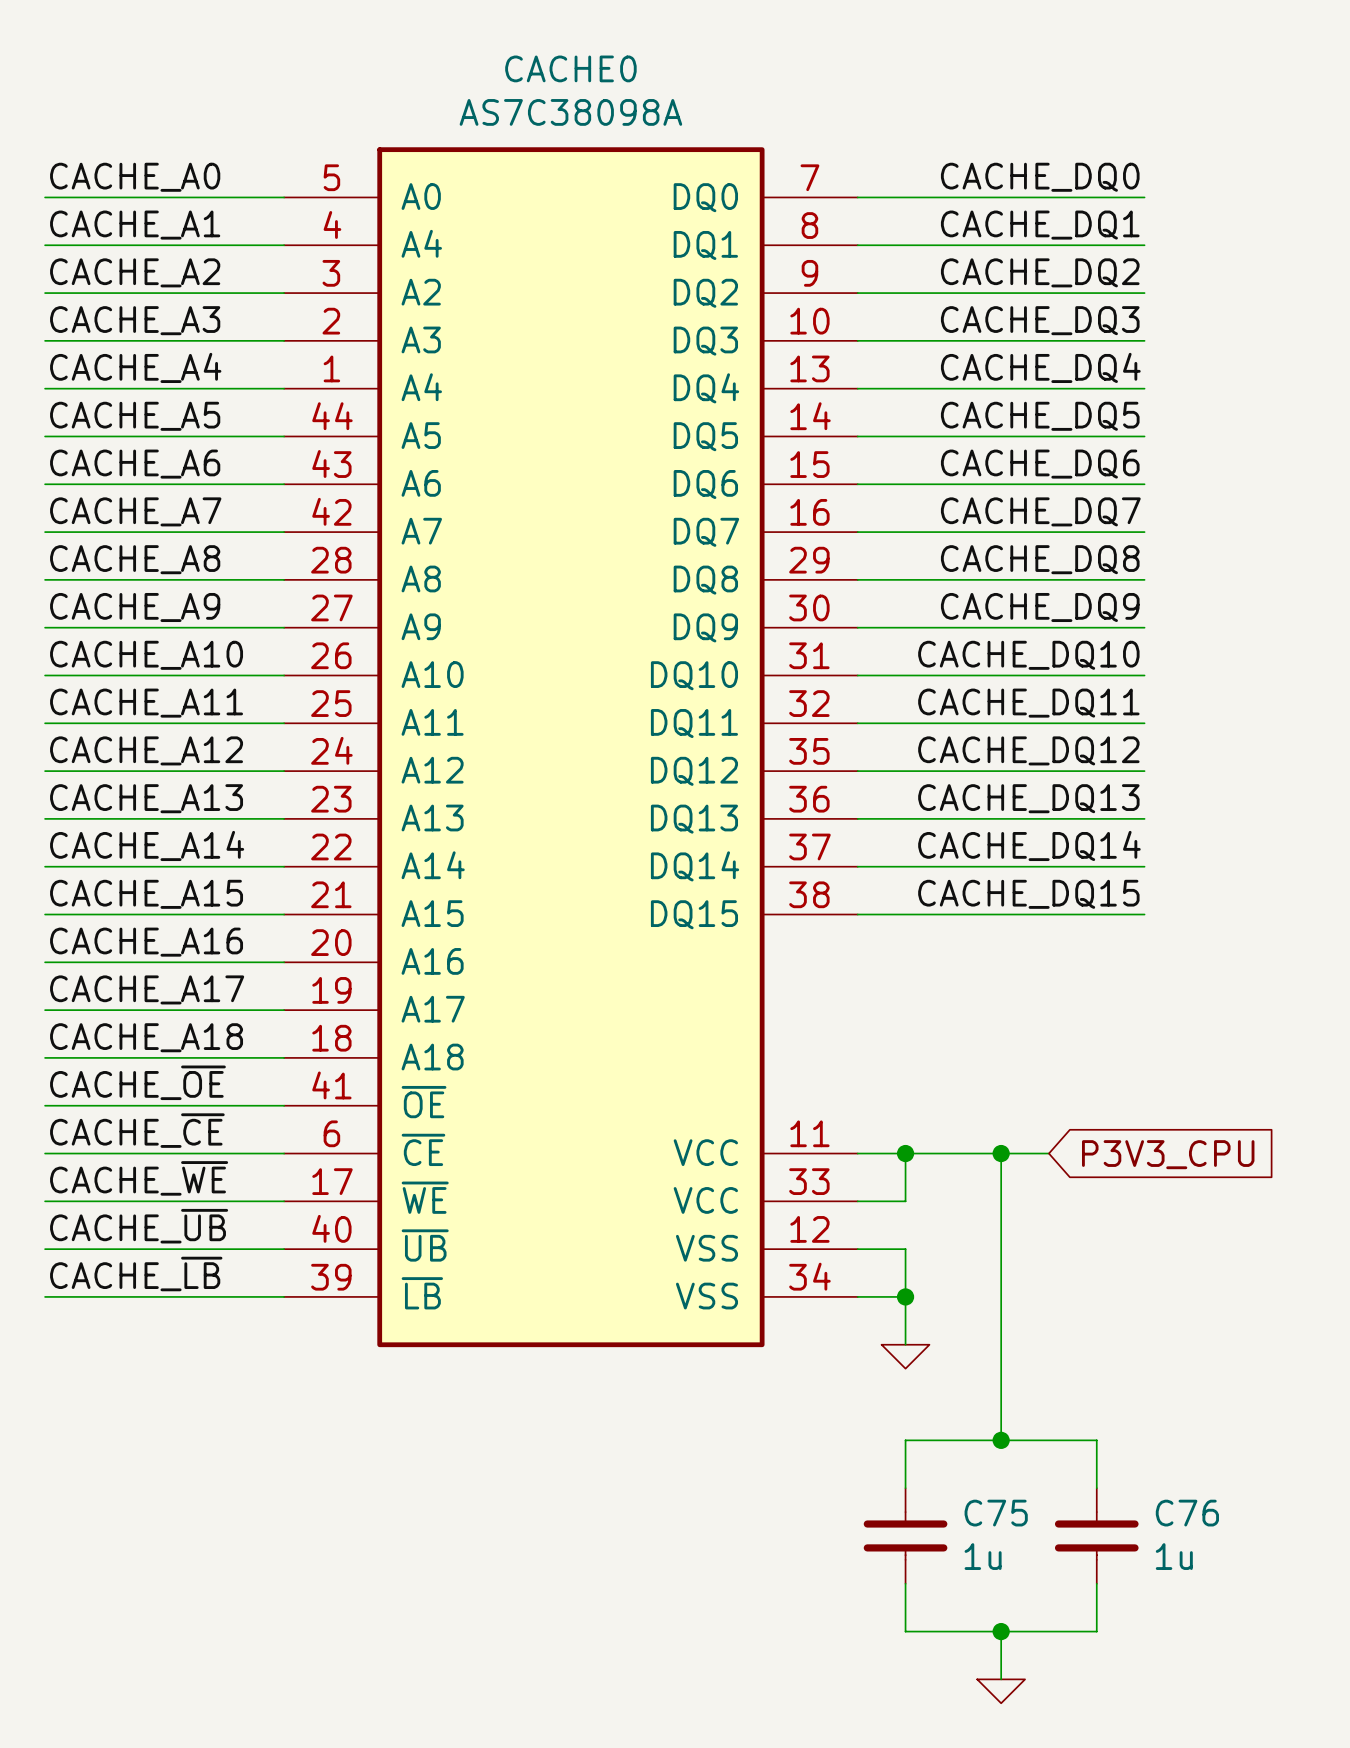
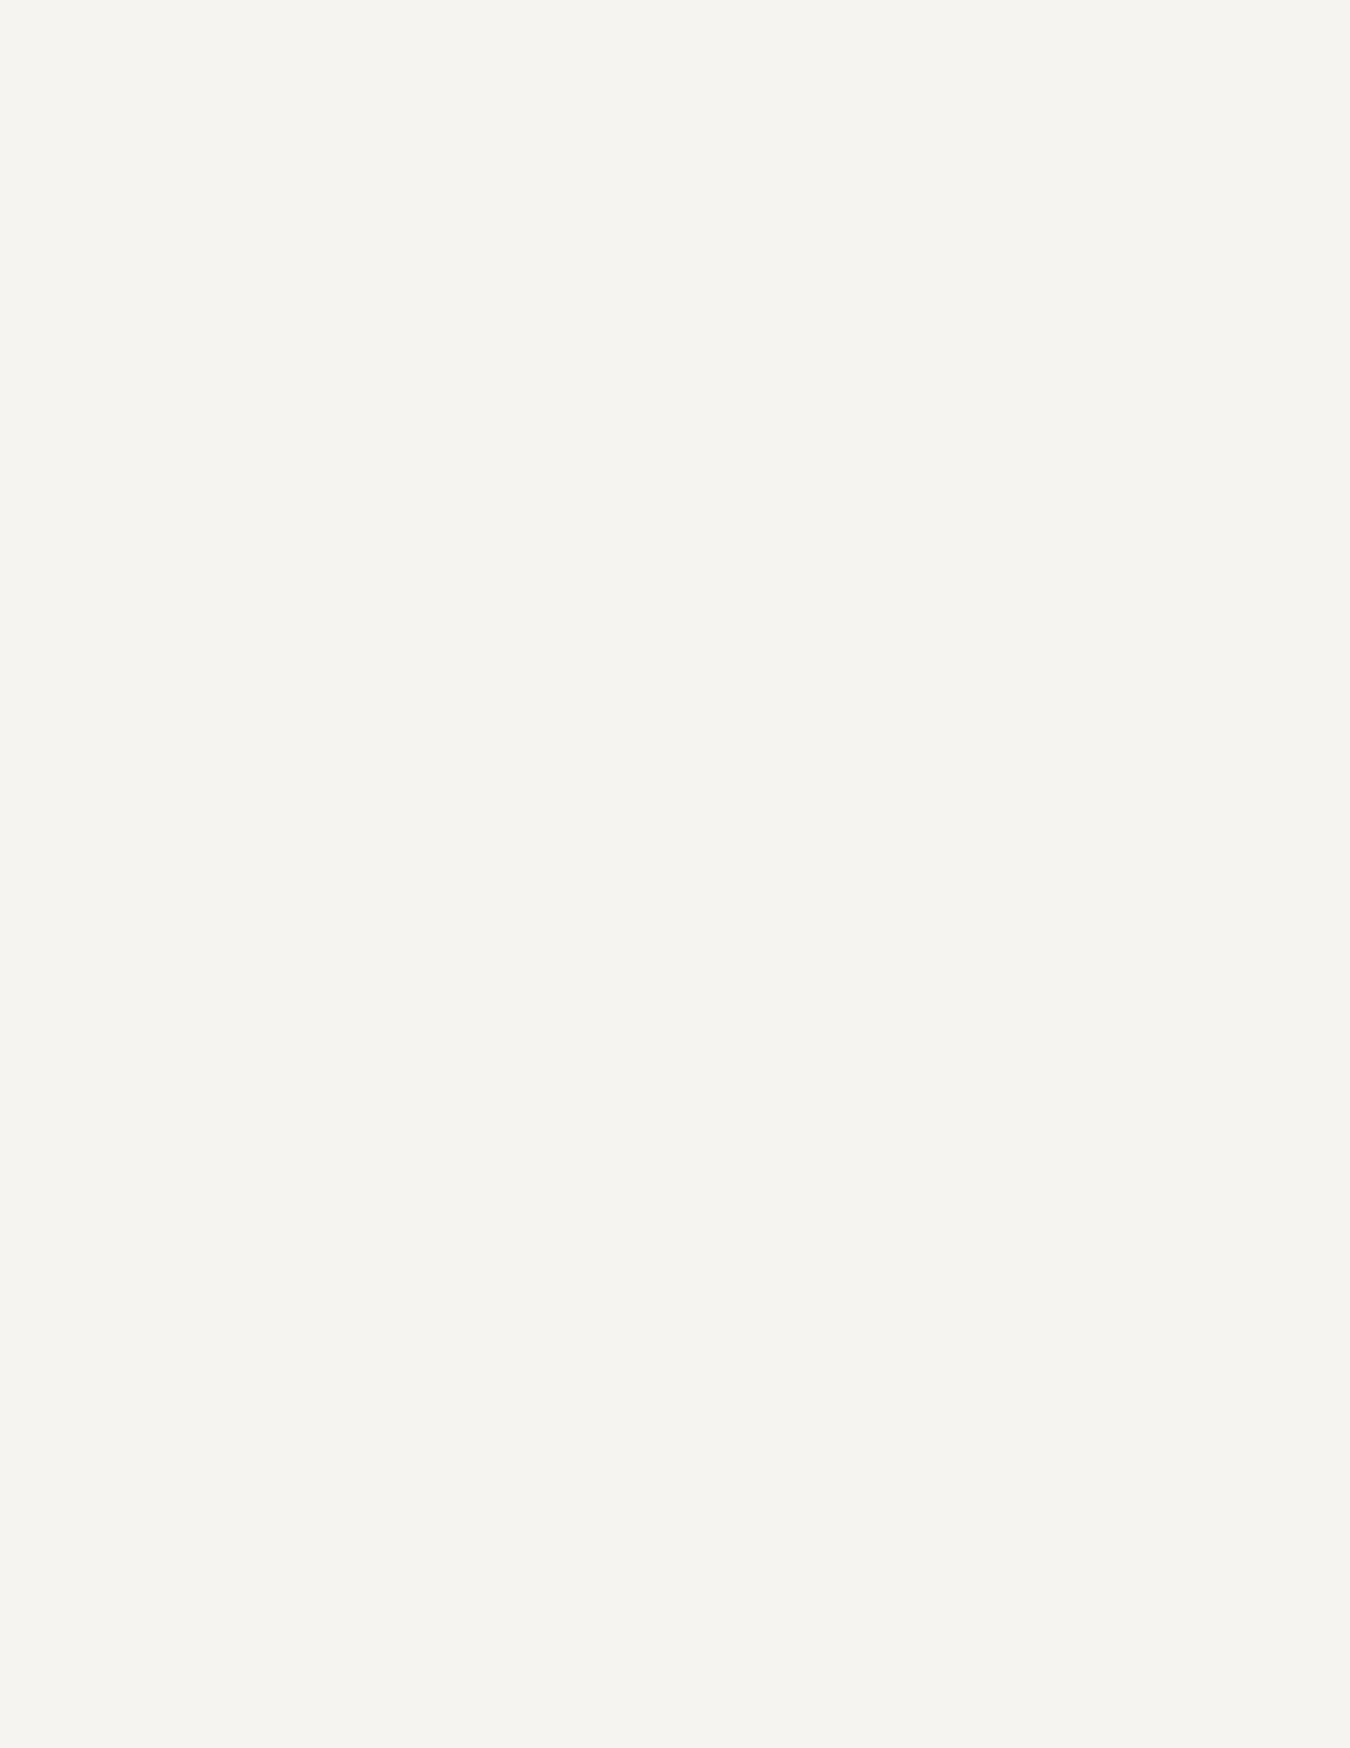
label: CACHE_A0 (135, 177) -> none
label: CACHE_DQ0 (1040, 177) -> none
wire: (45, 197) (284, 197) -> none
wire: (857, 197) (1144, 197) -> none
label: CACHE_A1 (135, 225) -> none
label: CACHE_DQ1 (1040, 225) -> none
wire: (45, 245) (284, 245) -> none
wire: (857, 245) (1144, 245) -> none
label: CACHE_A2 (135, 272) -> none
label: CACHE_DQ2 (1040, 272) -> none
wire: (45, 293) (284, 293) -> none
wire: (857, 293) (1144, 293) -> none
label: CACHE_A3 (135, 320) -> none
label: CACHE_DQ3 (1040, 320) -> none
wire: (45, 340) (284, 340) -> none
wire: (857, 340) (1144, 340) -> none
label: CACHE_A4 (135, 367) -> none
label: CACHE_DQ4 (1040, 367) -> none
wire: (45, 388) (284, 388) -> none
wire: (857, 388) (1144, 388) -> none
label: CACHE_A5 (135, 416) -> none
label: CACHE_DQ5 (1040, 416) -> none
wire: (45, 436) (284, 436) -> none
wire: (857, 436) (1144, 436) -> none
label: CACHE_A6 (135, 464) -> none
label: CACHE_DQ6 (1040, 464) -> none
wire: (45, 484) (284, 484) -> none
wire: (857, 484) (1144, 484) -> none
label: CACHE_A7 (135, 511) -> none
label: CACHE_DQ7 (1040, 511) -> none
wire: (45, 532) (284, 532) -> none
wire: (857, 532) (1144, 532) -> none
label: CACHE_A8 (135, 559) -> none
label: CACHE_DQ8 (1040, 559) -> none
wire: (45, 579) (284, 579) -> none
wire: (857, 579) (1144, 579) -> none
label: CACHE_A9 (135, 607) -> none
label: CACHE_DQ9 (1040, 607) -> none
wire: (45, 627) (284, 627) -> none
wire: (857, 627) (1144, 627) -> none
label: CACHE_A10 (146, 655) -> none
label: CACHE_DQ10 (1028, 655) -> none
wire: (45, 675) (284, 675) -> none
wire: (857, 675) (1144, 675) -> none
label: CACHE_A11 (146, 703) -> none
label: CACHE_DQ11 (1028, 703) -> none
wire: (45, 723) (284, 723) -> none
wire: (857, 723) (1144, 723) -> none
CACHE0: AS7C38098A (570, 747) -> none
label: CACHE_A12 (146, 750) -> none
label: CACHE_DQ12 (1028, 750) -> none
wire: (45, 771) (284, 771) -> none
wire: (857, 771) (1144, 771) -> none
label: CACHE_A13 (146, 798) -> none
label: CACHE_DQ13 (1028, 798) -> none
wire: (45, 818) (284, 818) -> none
wire: (857, 818) (1144, 818) -> none
label: CACHE_A14 (147, 845) -> none
label: CACHE_DQ14 (1029, 845) -> none
wire: (45, 866) (284, 866) -> none
wire: (857, 866) (1144, 866) -> none
label: CACHE_A15 (146, 894) -> none
label: CACHE_DQ15 (1028, 894) -> none
wire: (45, 914) (284, 914) -> none
wire: (857, 914) (1144, 914) -> none
label: CACHE_A16 (146, 942) -> none
wire: (45, 962) (284, 962) -> none
label: CACHE_A17 (147, 989) -> none
wire: (45, 1010) (284, 1010) -> none
label: CACHE_A18 (146, 1037) -> none
wire: (45, 1057) (284, 1057) -> none
label: CACHE_~{OE} (137, 1082) -> none
wire: (45, 1105) (284, 1105) -> none
label: CACHE_~{CE} (137, 1130) -> none
wire: (45, 1153) (284, 1153) -> none
wire: (857, 1153) (1048, 1153) -> none
wire: (905, 1153) (905, 1201) (857, 1201) -> none
junction: (905, 1153) -> none
wire: (1001, 1153) (1001, 1440) -> none
junction: (1001, 1153) -> none
global label: P3V3_CPU (1168, 1154) -> none
label: CACHE_~{WE} (139, 1178) -> none
wire: (45, 1201) (284, 1201) -> none
label: CACHE_~{UB} (139, 1226) -> none
wire: (45, 1249) (284, 1249) -> none
wire: (857, 1249) (905, 1249) (905, 1344) -> none
label: CACHE_~{LB} (136, 1274) -> none
wire: (45, 1296) (284, 1296) -> none
wire: (857, 1296) (905, 1296) -> none
junction: (905, 1296) -> none
power symbol: (905, 1356) -> none
junction: (1001, 1440) -> none
wire: (905, 1488) (905, 1440) (1096, 1440) (1096, 1488) -> none
C75: 1u (905, 1535) -> none
C76: 1u (1096, 1535) -> none
wire: (905, 1583) (905, 1631) (1096, 1631) (1096, 1583) -> none
wire: (1001, 1631) (1001, 1679) -> none
junction: (1001, 1631) -> none
power symbol: (1001, 1691) -> none

